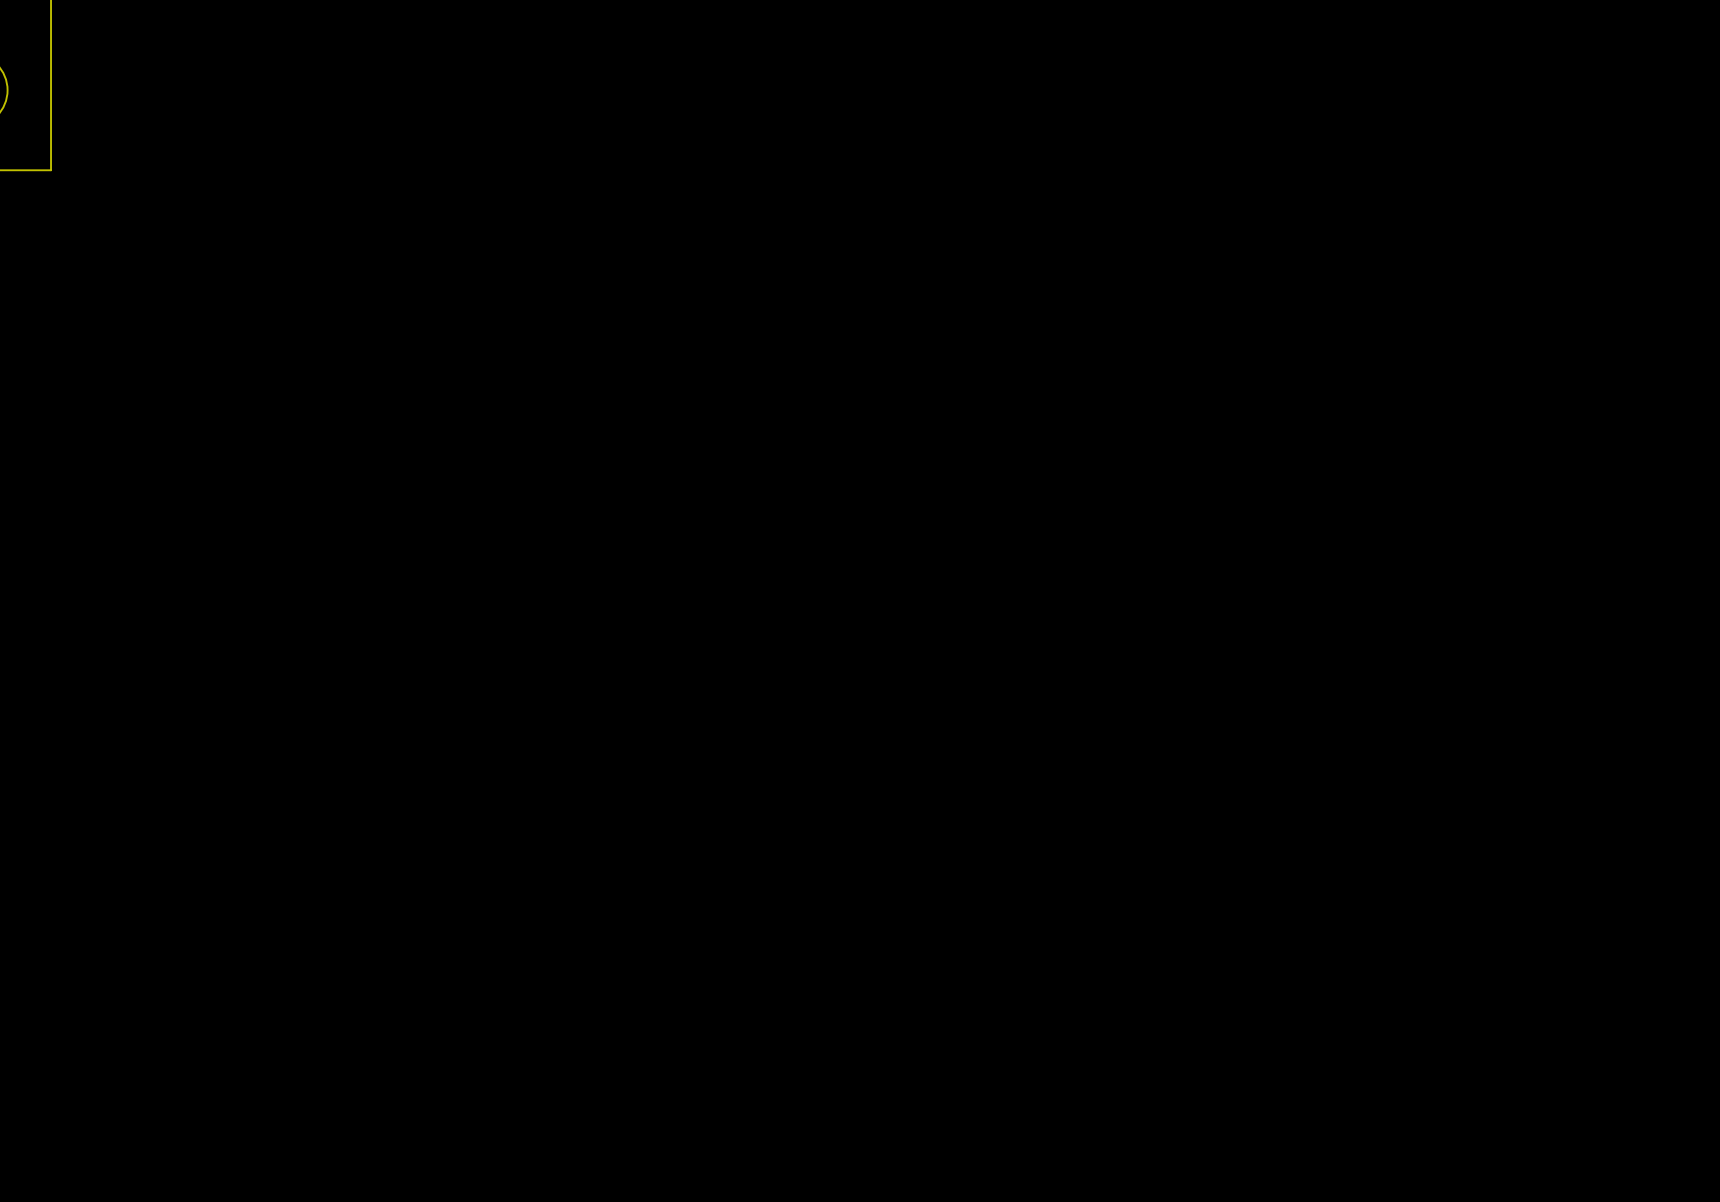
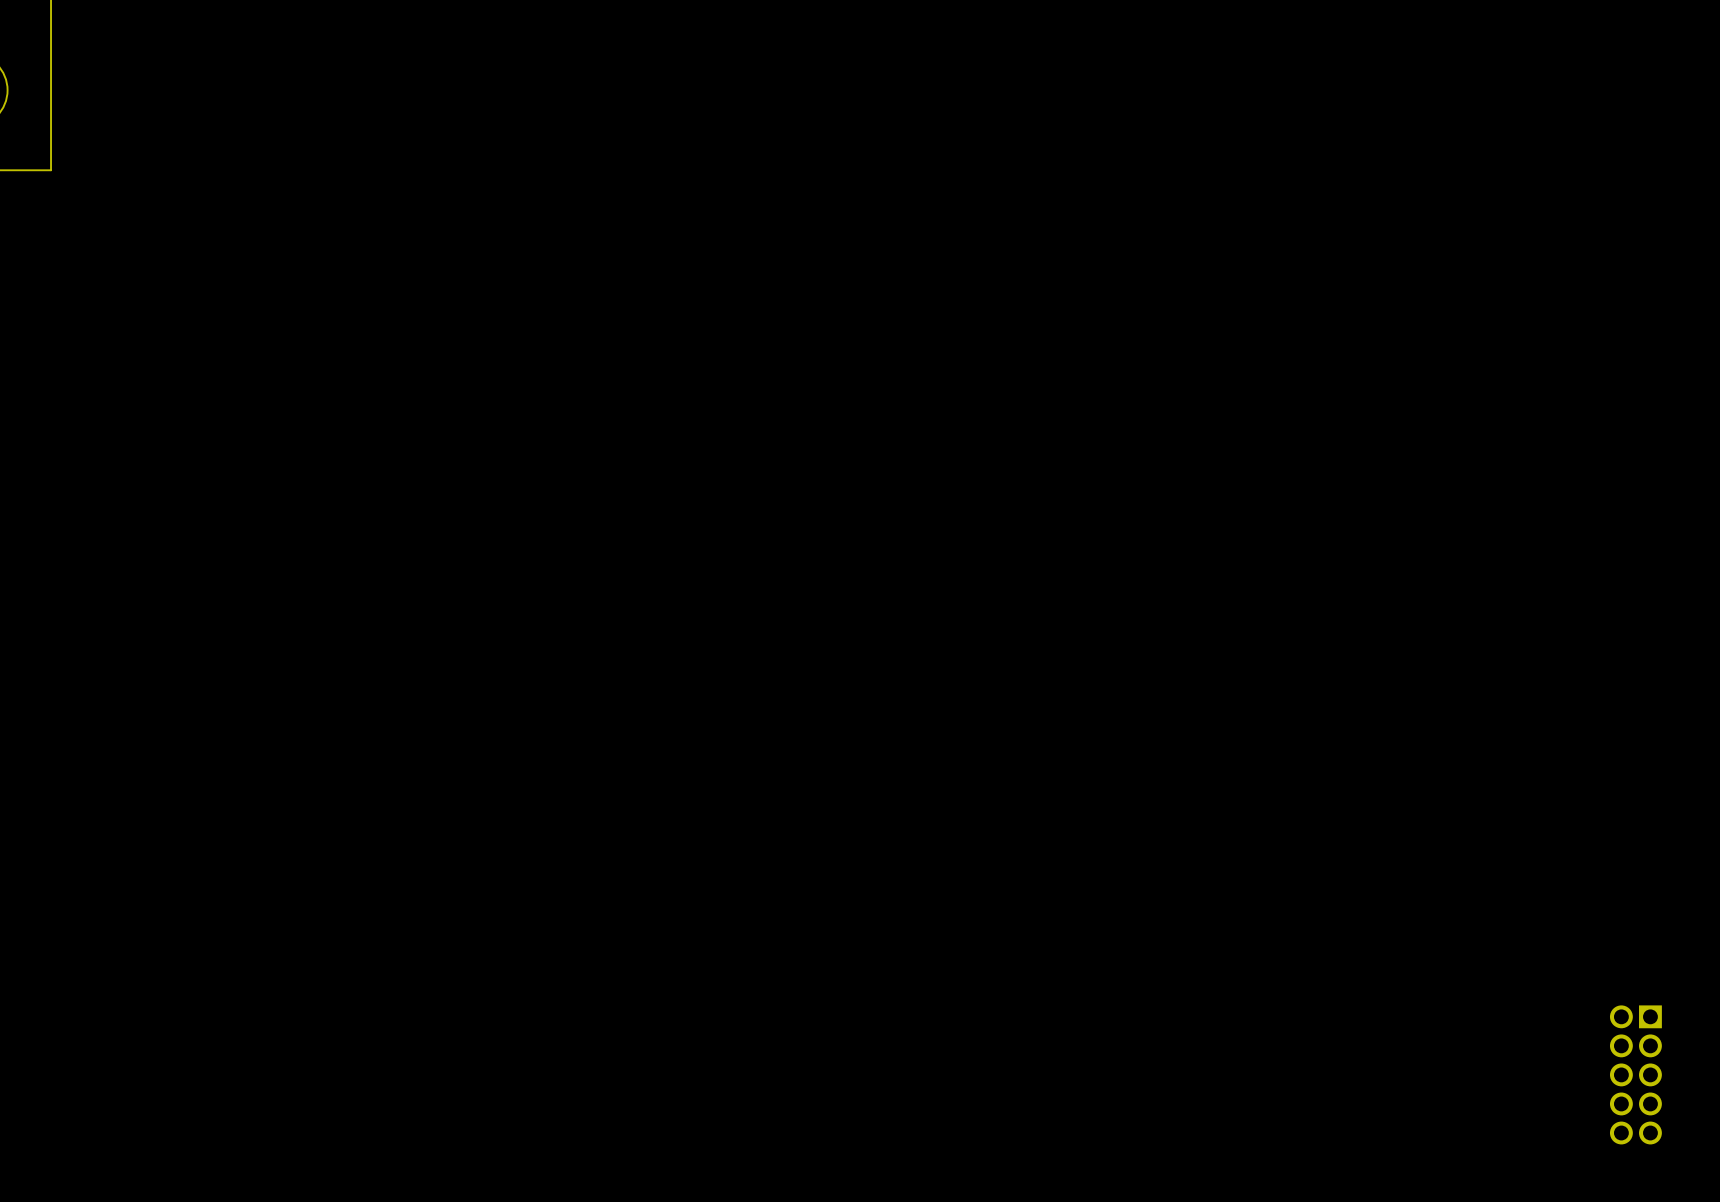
part: none -> (1635, 1074)

